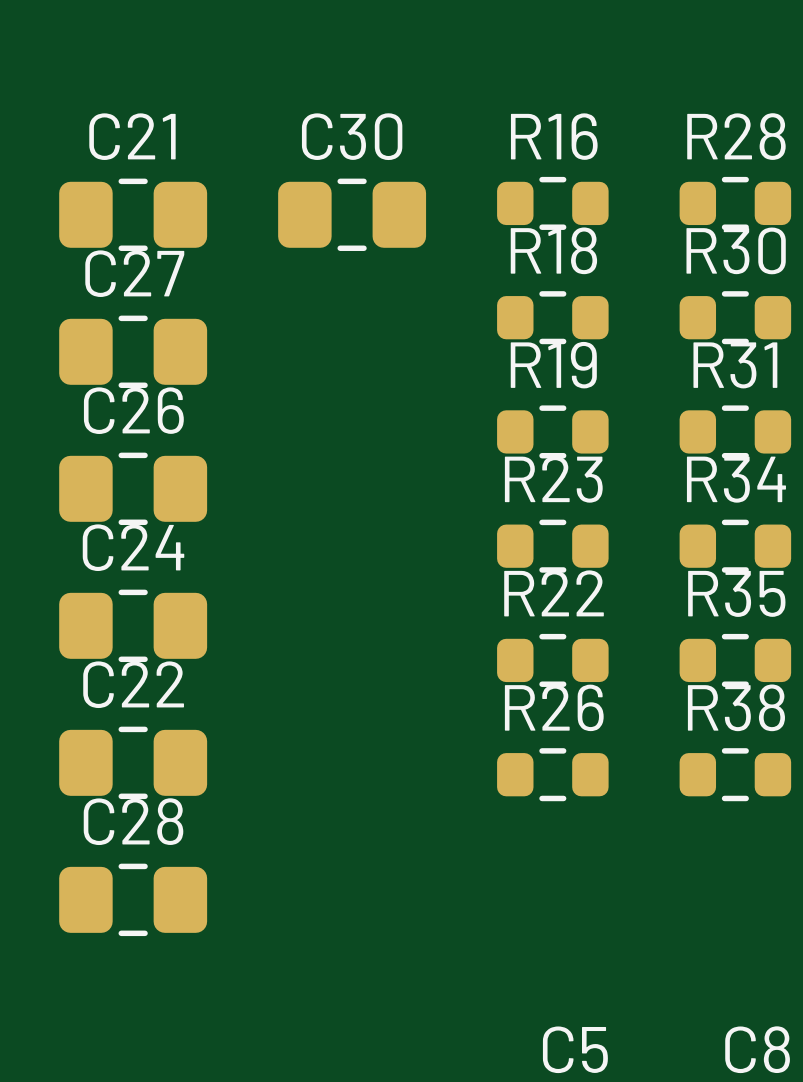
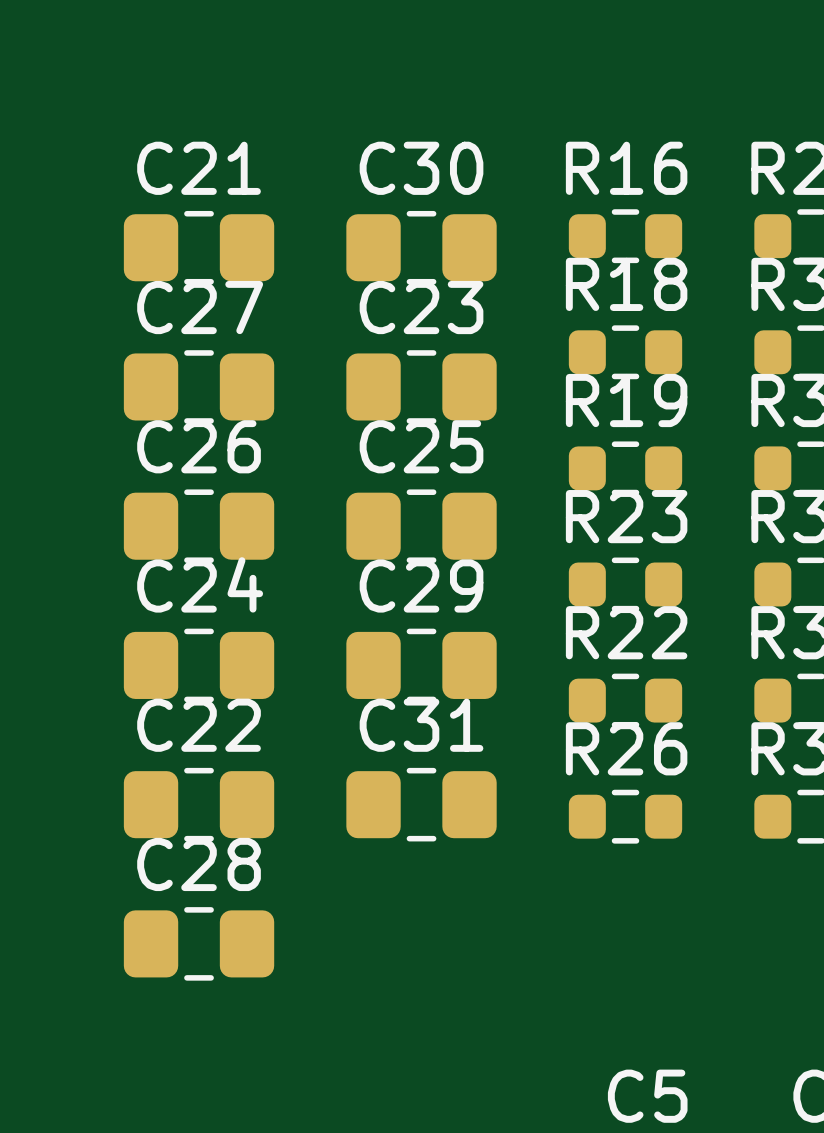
C23: none -> (421, 386)
C25: none -> (421, 526)
C29: none -> (421, 665)
C31: none -> (421, 804)

